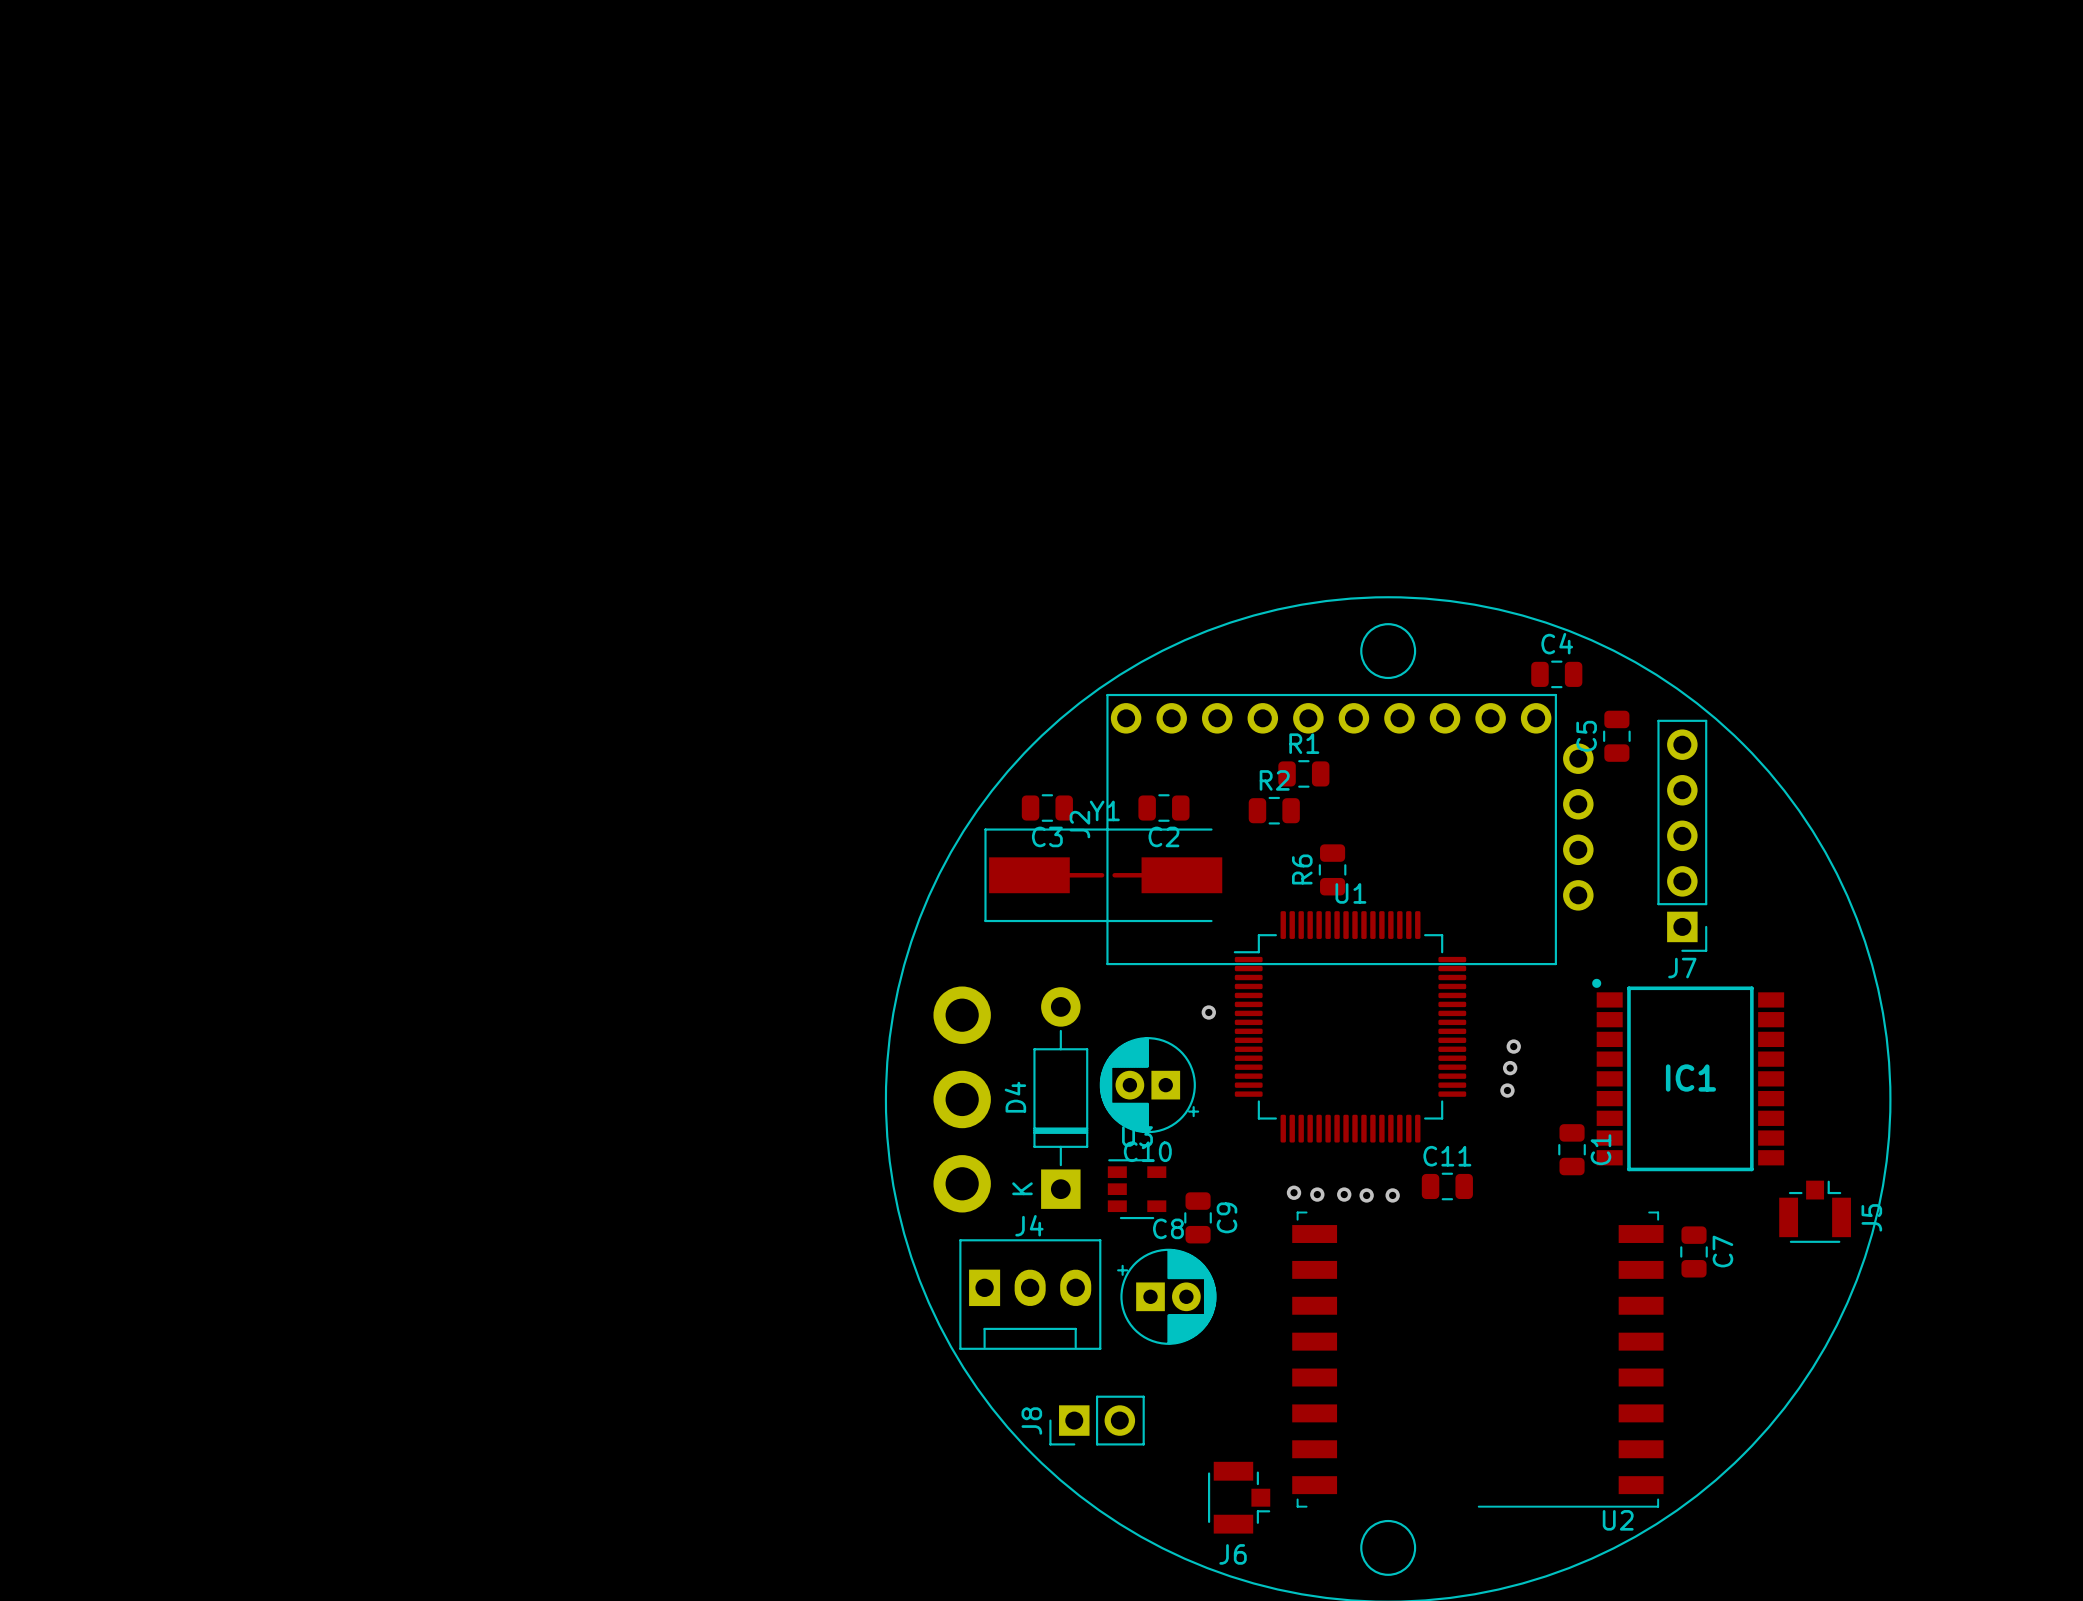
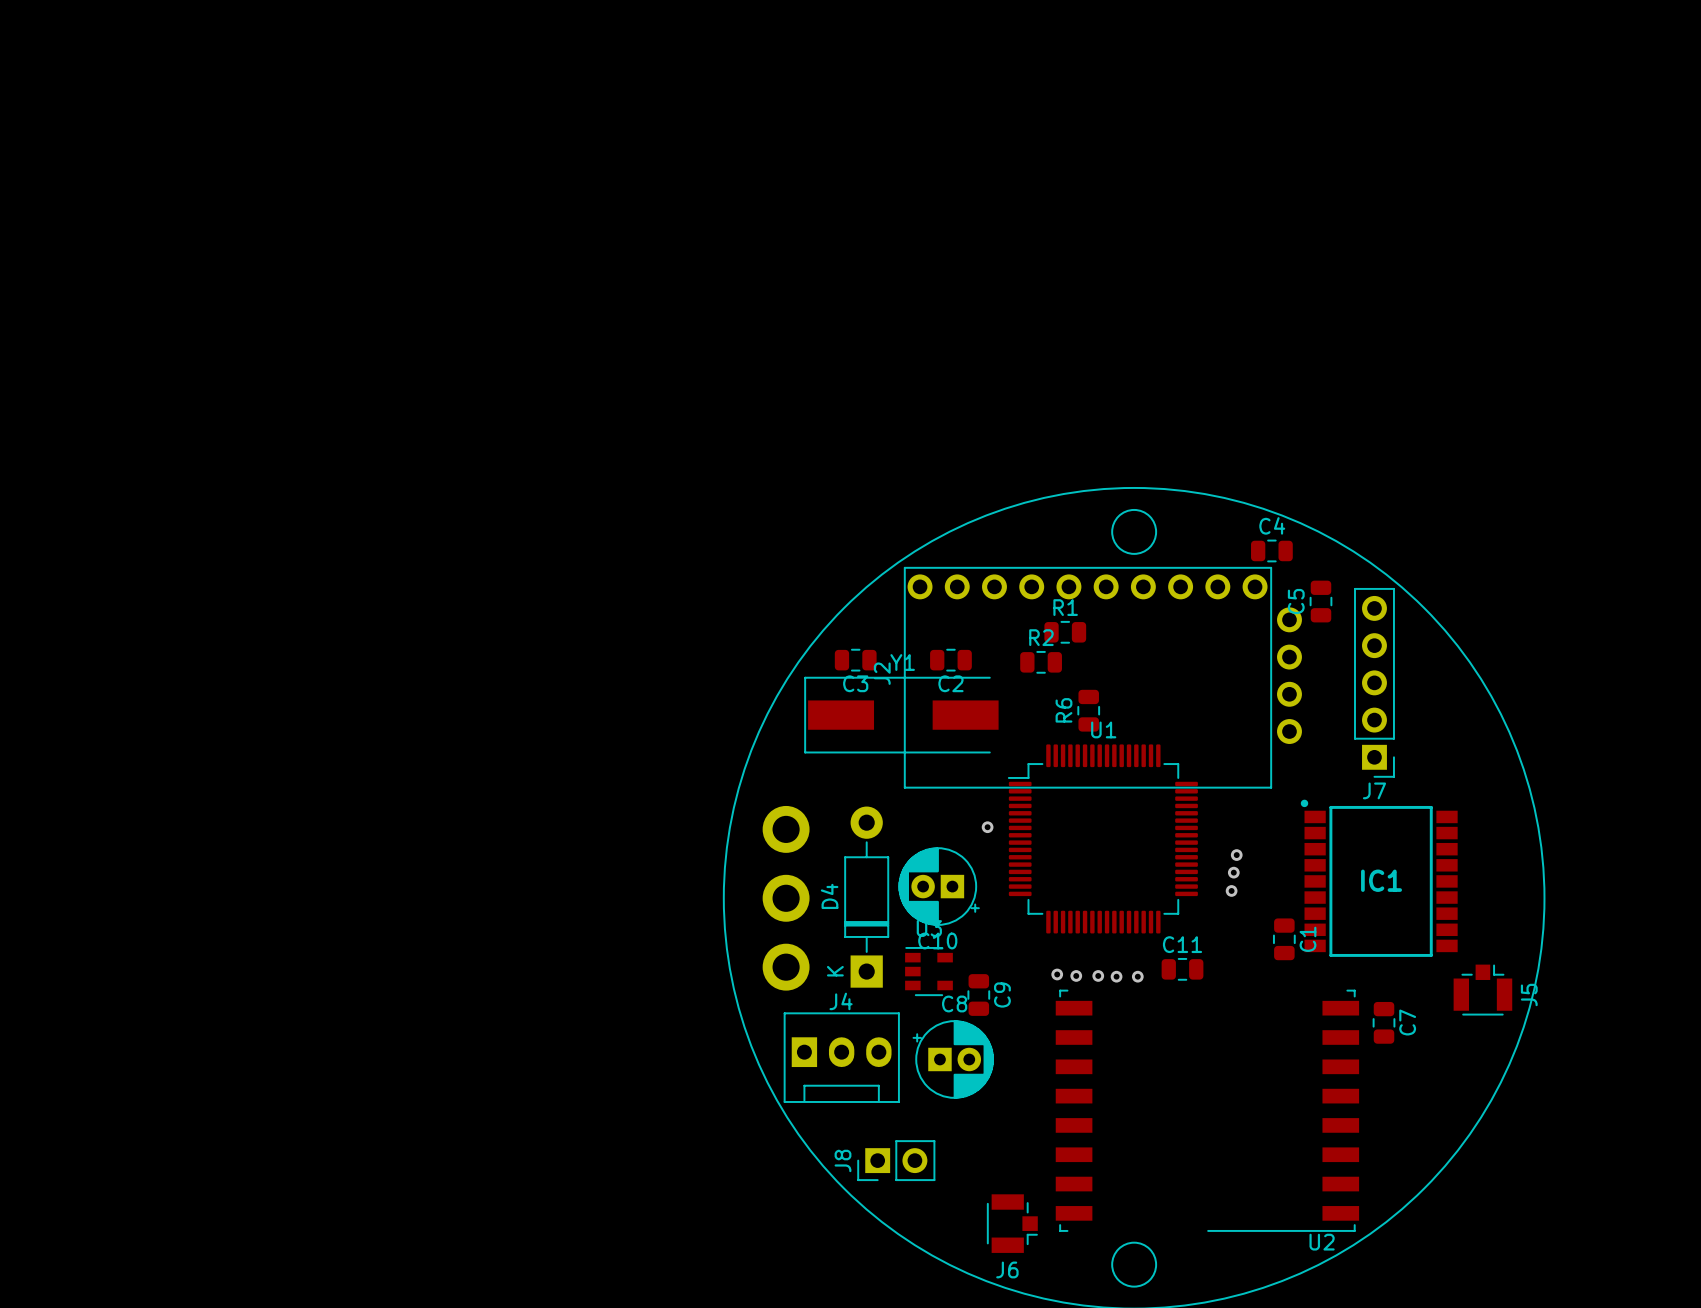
track: (1029, 875) (1102, 875) -> none
track: (1114, 875) (1181, 875) -> none

